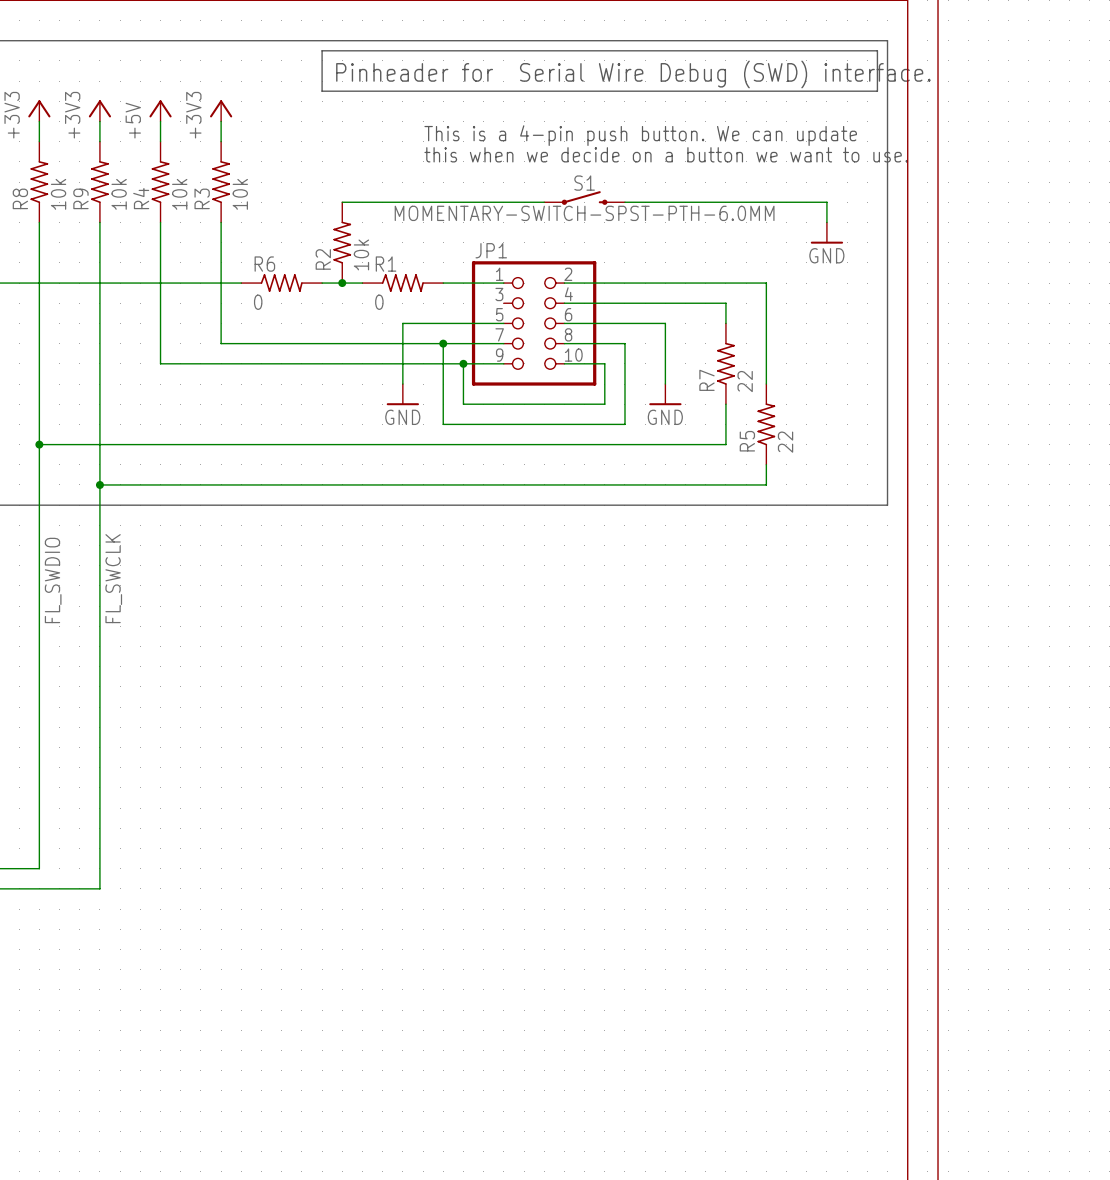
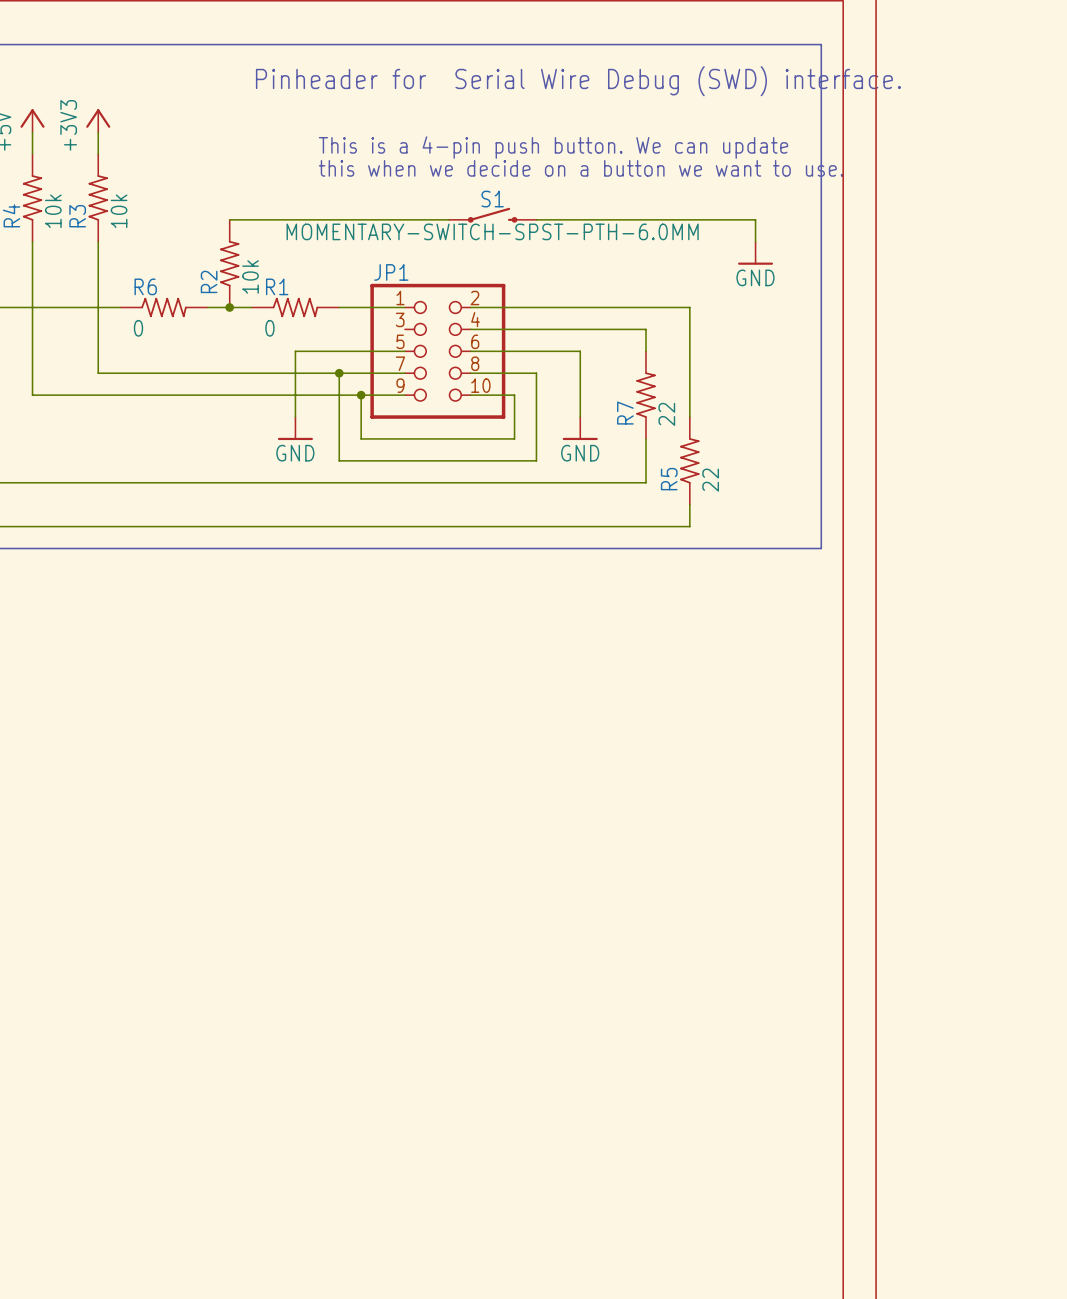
line: (322, 50) (322, 91) (877, 91) (877, 50) (322, 50) -> none
text position: Pinheader for Serial Wire Debug (SWD) interface. (633, 74) -> Pinheader for Serial Wire Debug (SWD) interface. (578, 81)

